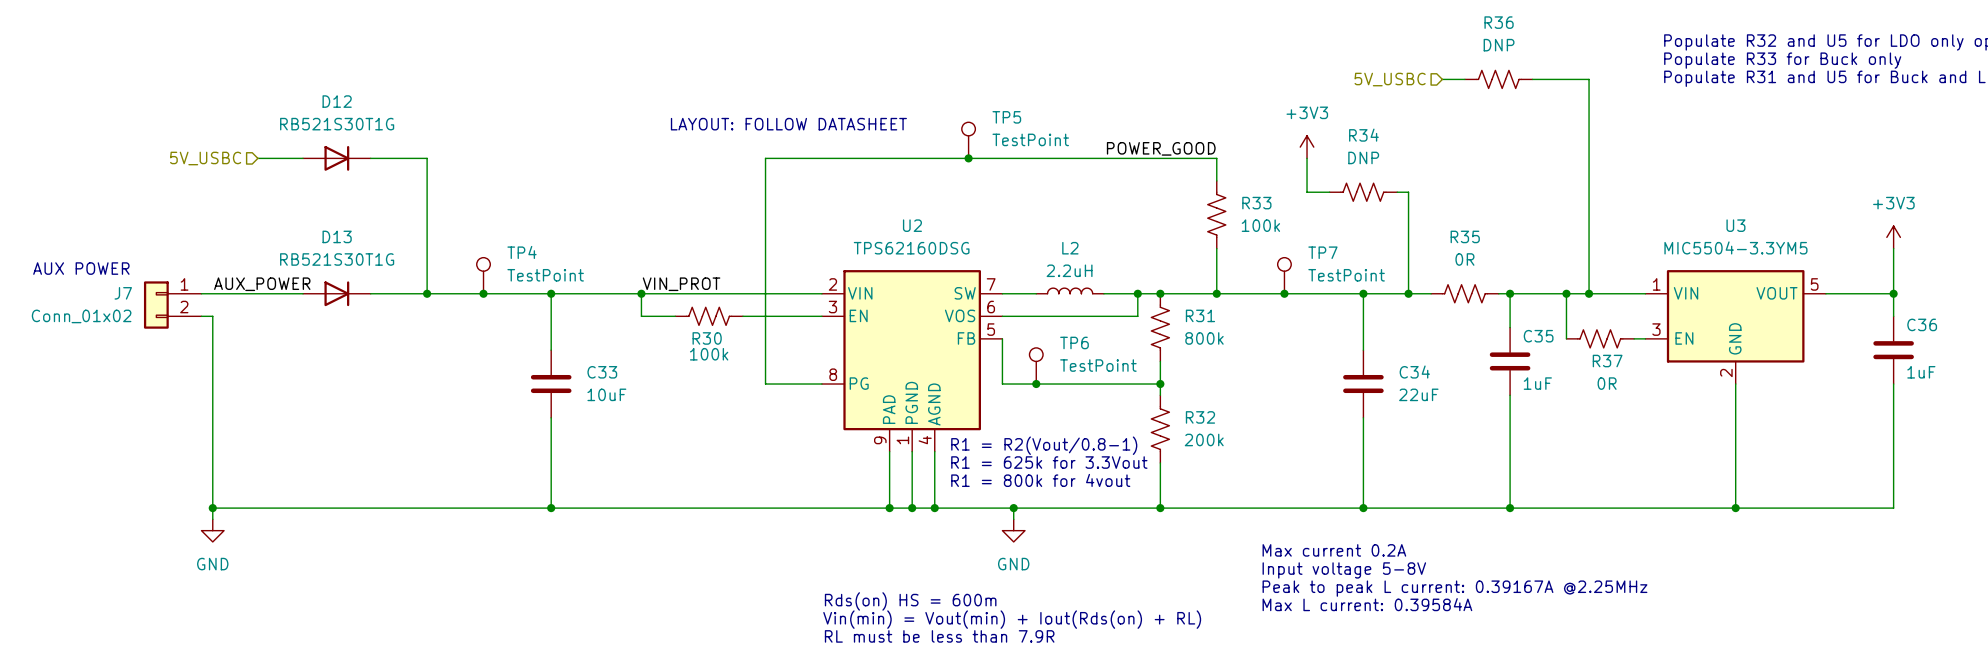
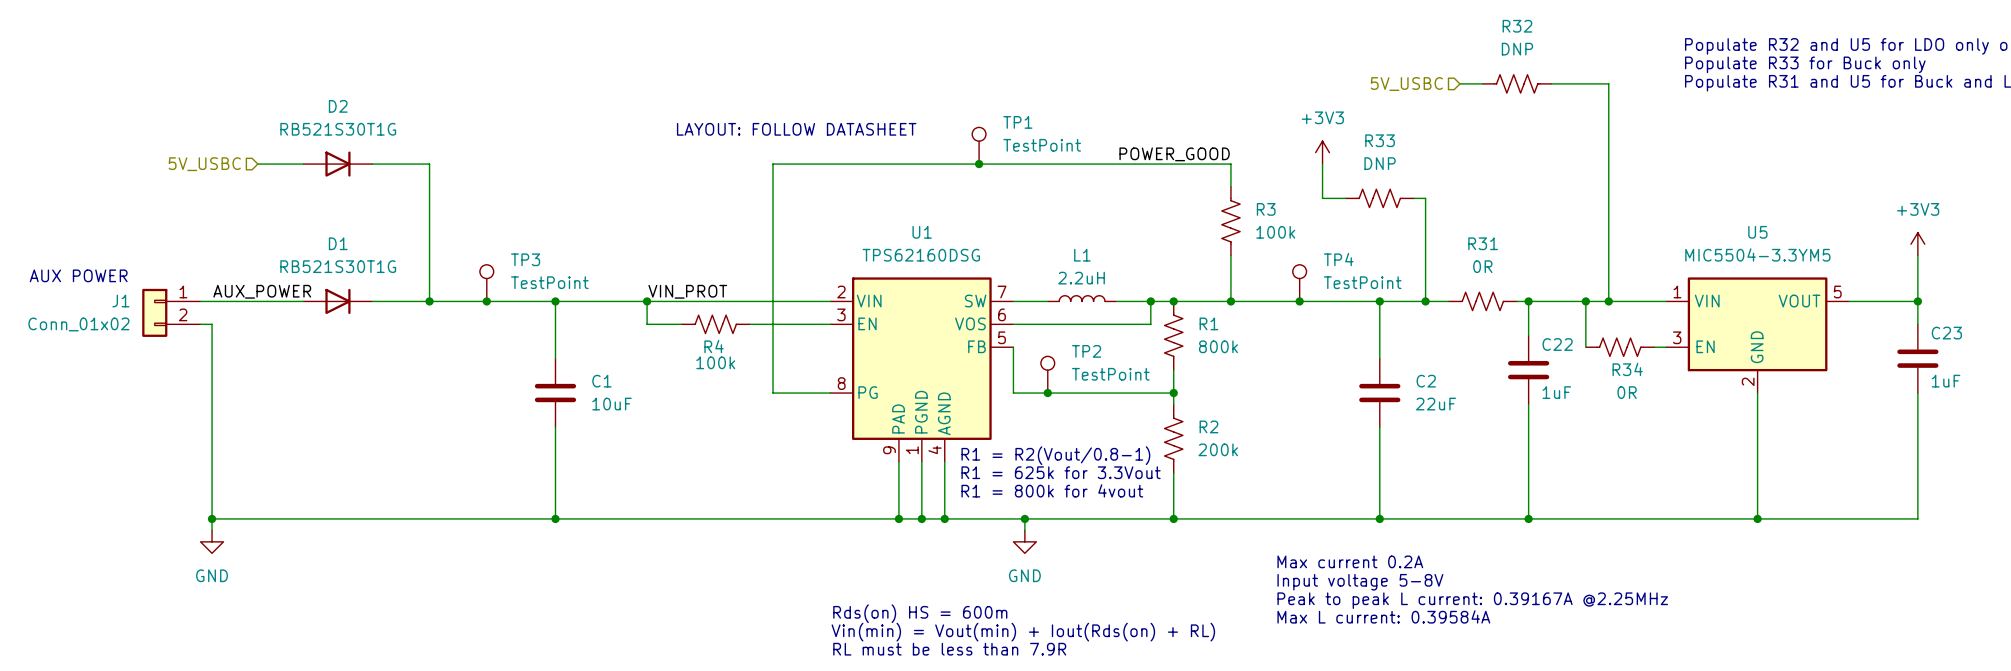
R36 name: R36 (1499, 22) -> R32 (1517, 26)
D12 name: D12 (337, 101) -> D2 (338, 106)
TP5 name: TP5 (1006, 117) -> TP1 (1017, 122)
R34 name: R34 (1363, 135) -> R33 (1380, 140)
R33 name: R33 (1256, 203) -> R3 (1266, 209)
U2 name: U2 (912, 225) -> U1 (922, 232)
U3 name: U3 (1735, 225) -> U5 (1757, 232)
D13 name: D13 (337, 236) -> D1 (338, 243)
R35 name: R35 (1465, 236) -> R31 (1483, 243)
L2 name: L2 (1070, 248) -> L1 (1082, 255)
TP4 name: TP4 (522, 252) -> TP3 (525, 259)
TP7 name: TP7 (1322, 252) -> TP4 (1338, 259)
J7 name: J7 (123, 293) -> J1 (120, 301)
R31 name: R31 (1200, 315) -> R1 (1208, 323)
C36 name: C36 (1922, 324) -> C23 (1946, 333)
C35 name: C35 (1538, 336) -> C22 (1557, 344)
R30 name: R30 (707, 338) -> R4 (714, 346)
TP6 name: TP6 (1074, 342) -> TP2 (1086, 351)
R37 name: R37 (1607, 361) -> R34 (1627, 369)
C33 name: C33 (602, 372) -> C1 (601, 381)
C34 name: C34 (1414, 372) -> C2 (1426, 381)
R32 name: R32 (1200, 417) -> R2 (1208, 426)

